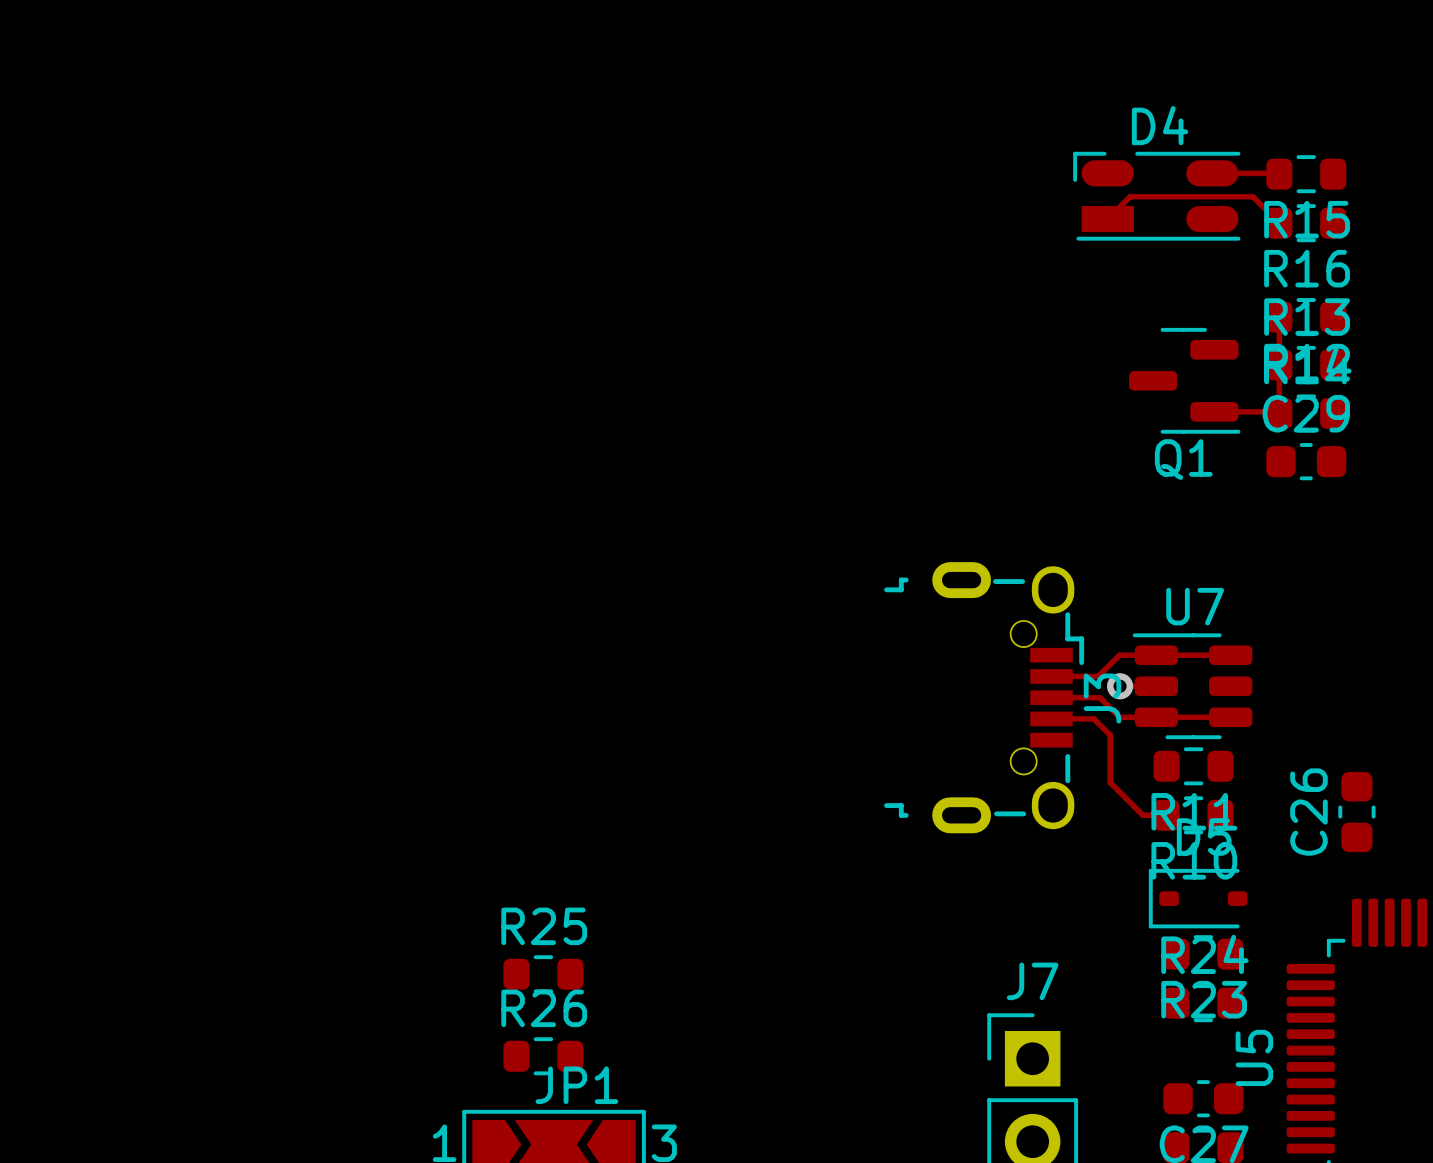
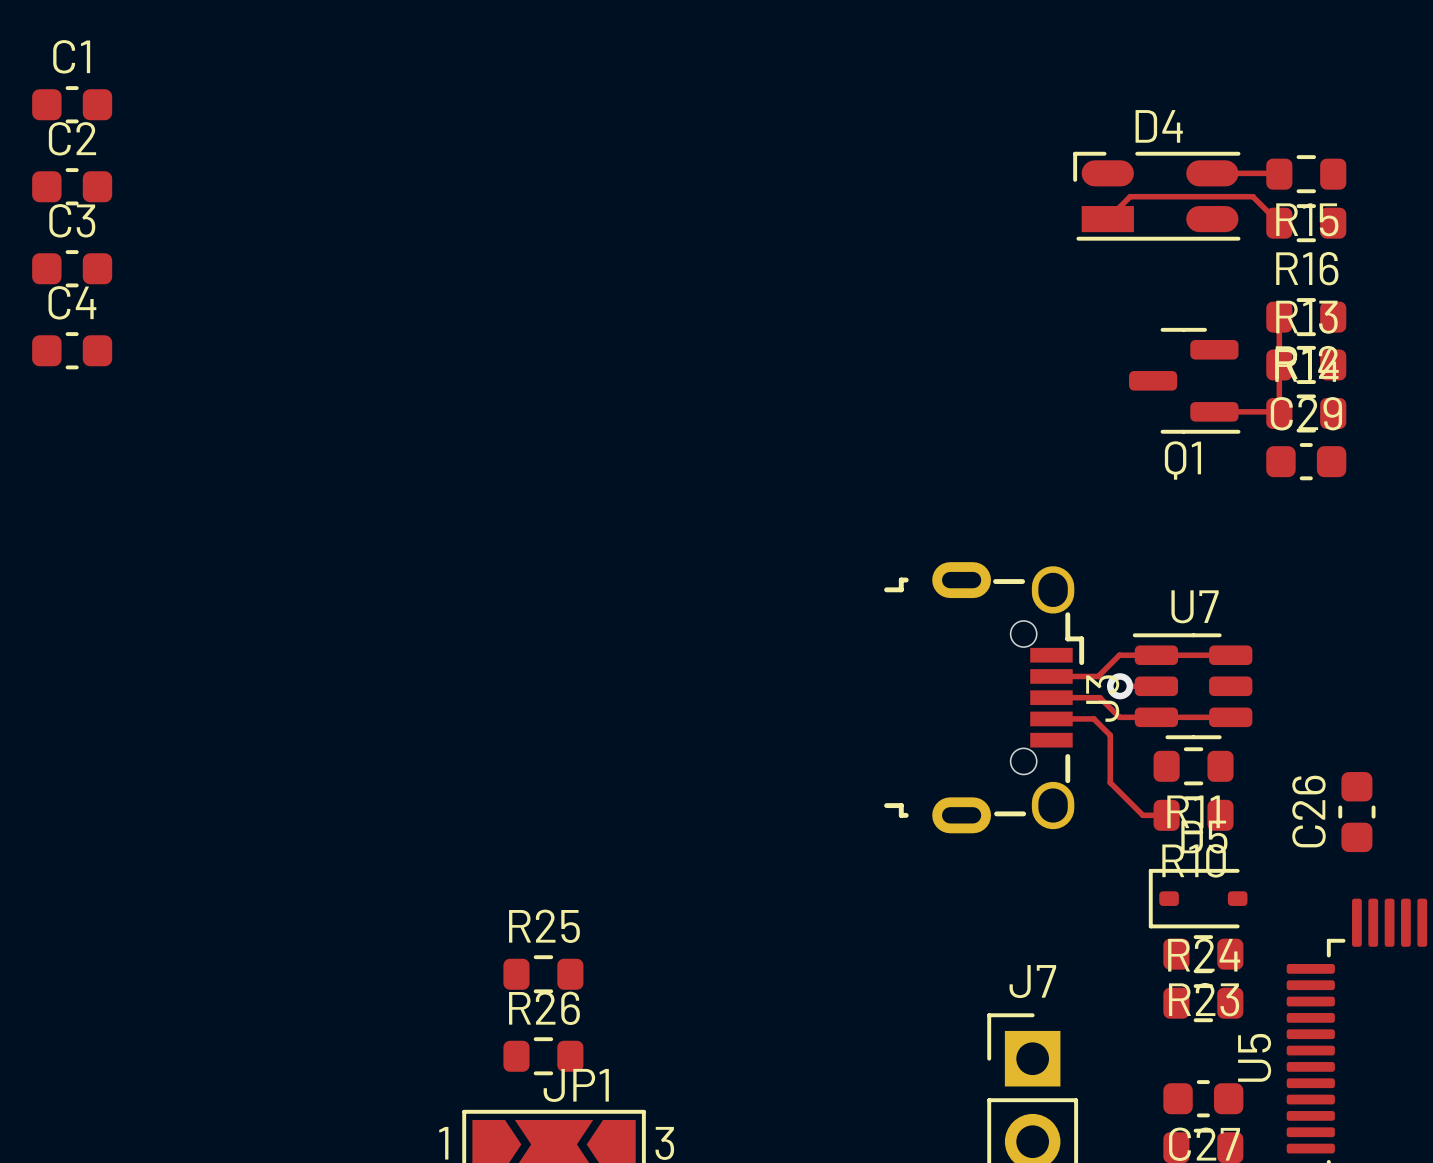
C1: none -> (72, 104)
C2: none -> (72, 186)
C3: none -> (72, 268)
C4: none -> (72, 350)

